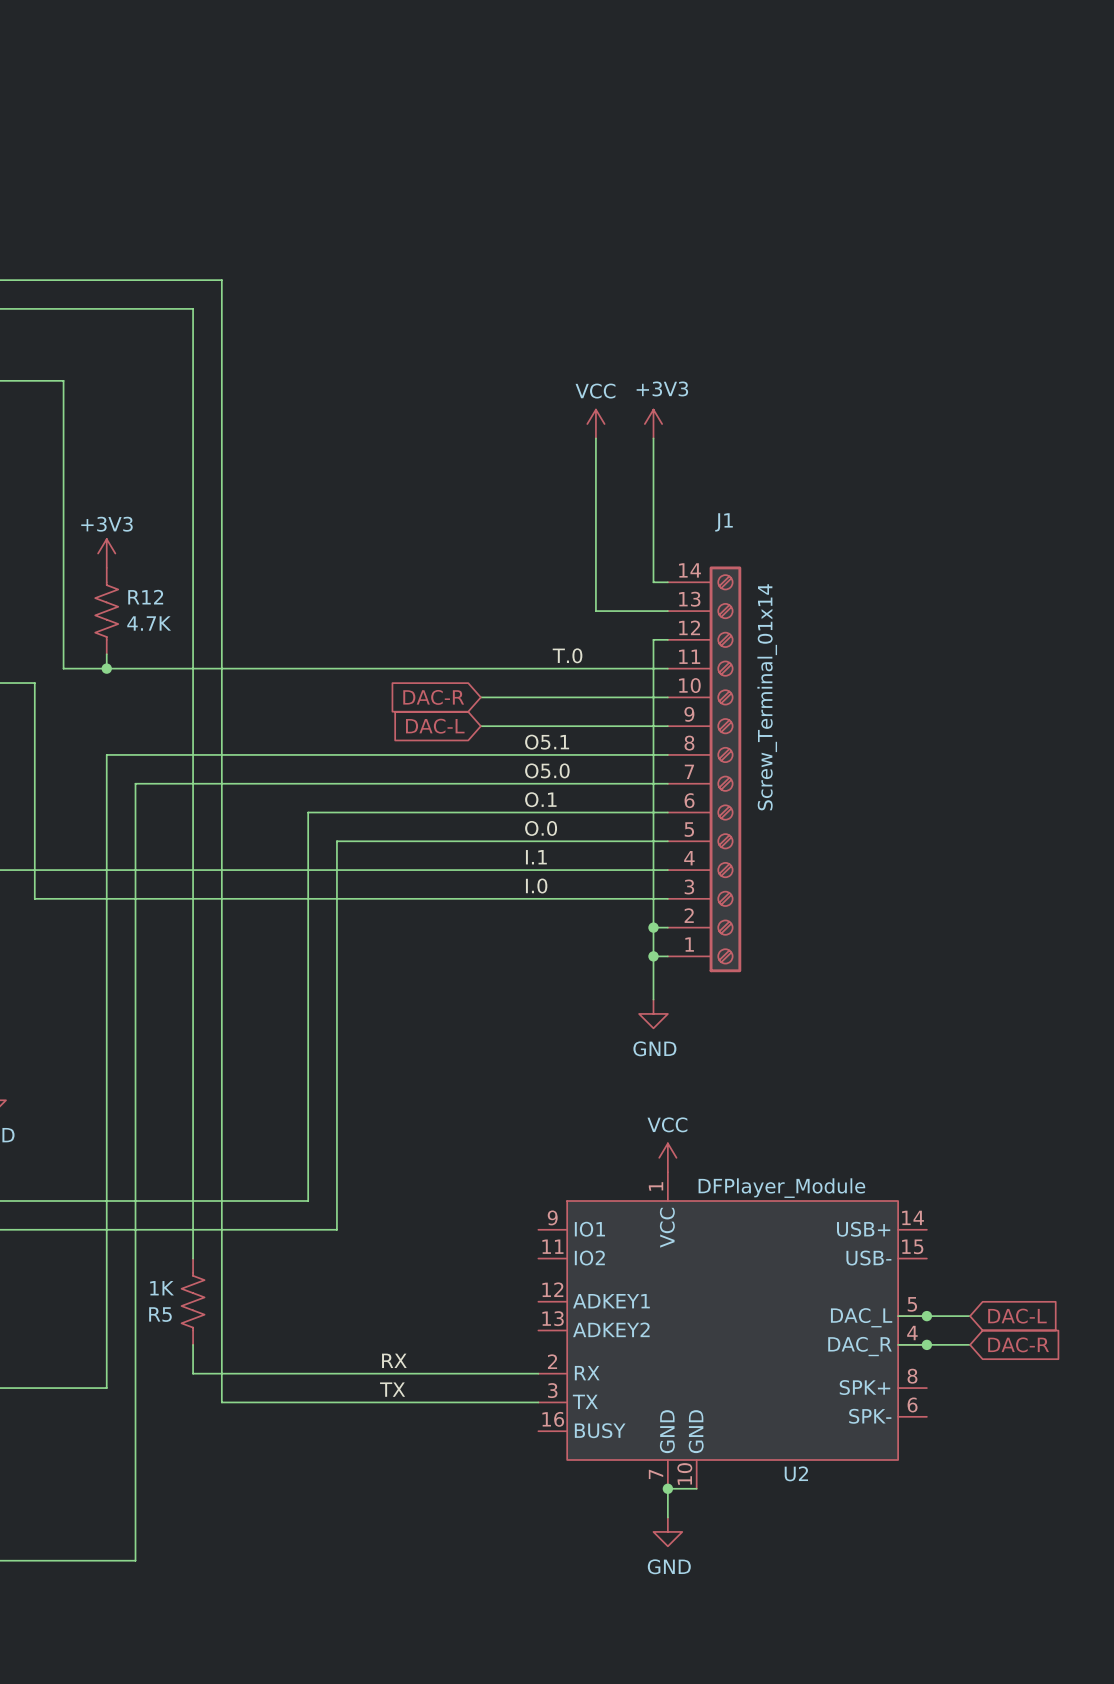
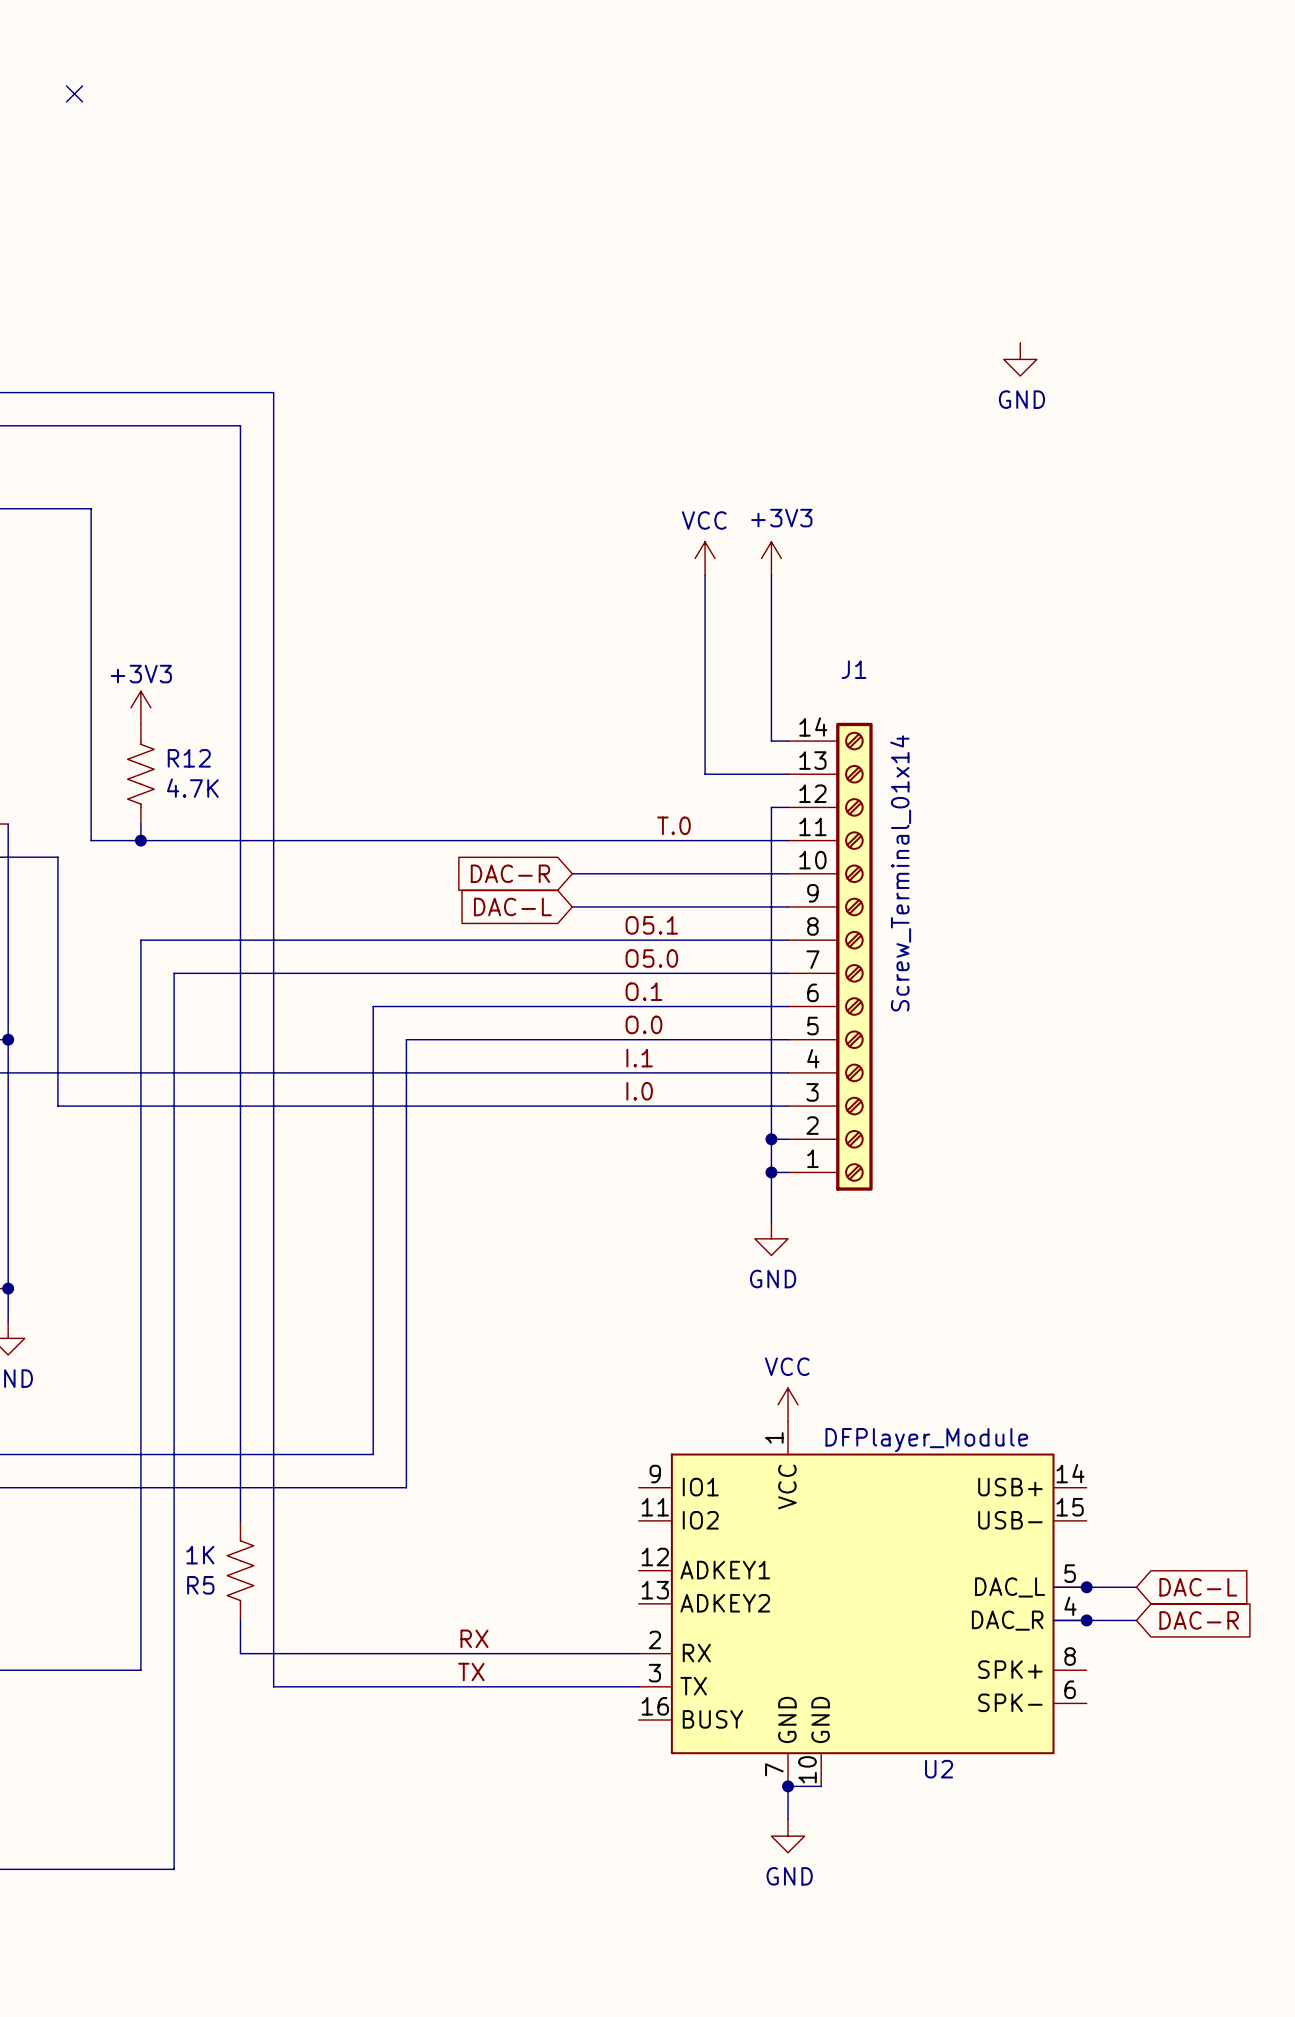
no-connect mark: none -> (74, 93)
power symbol: none -> GND (1020, 359)

